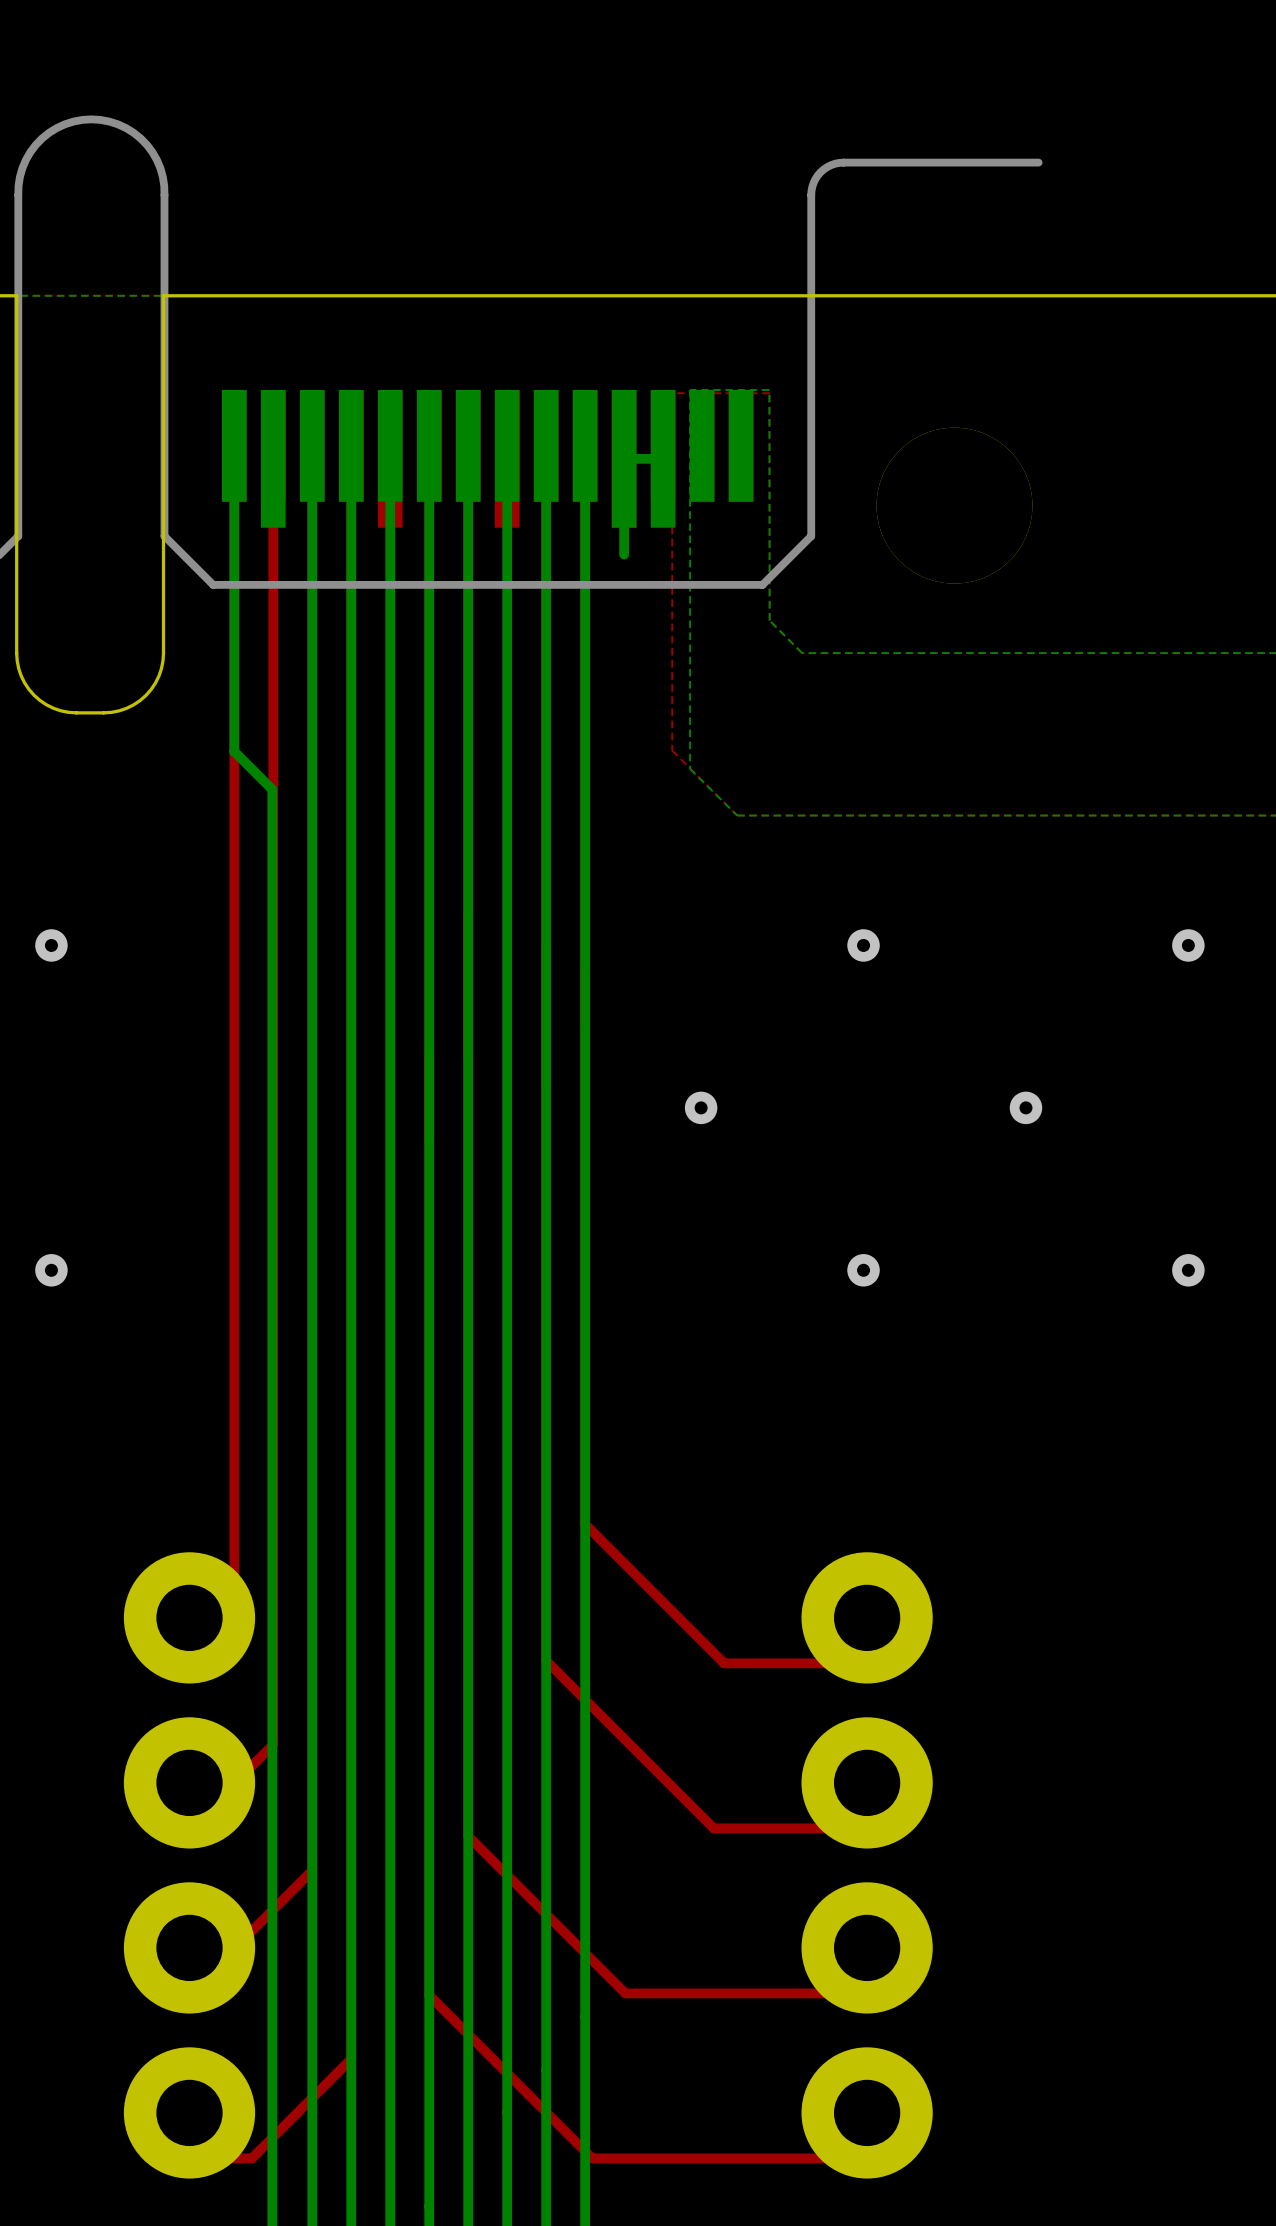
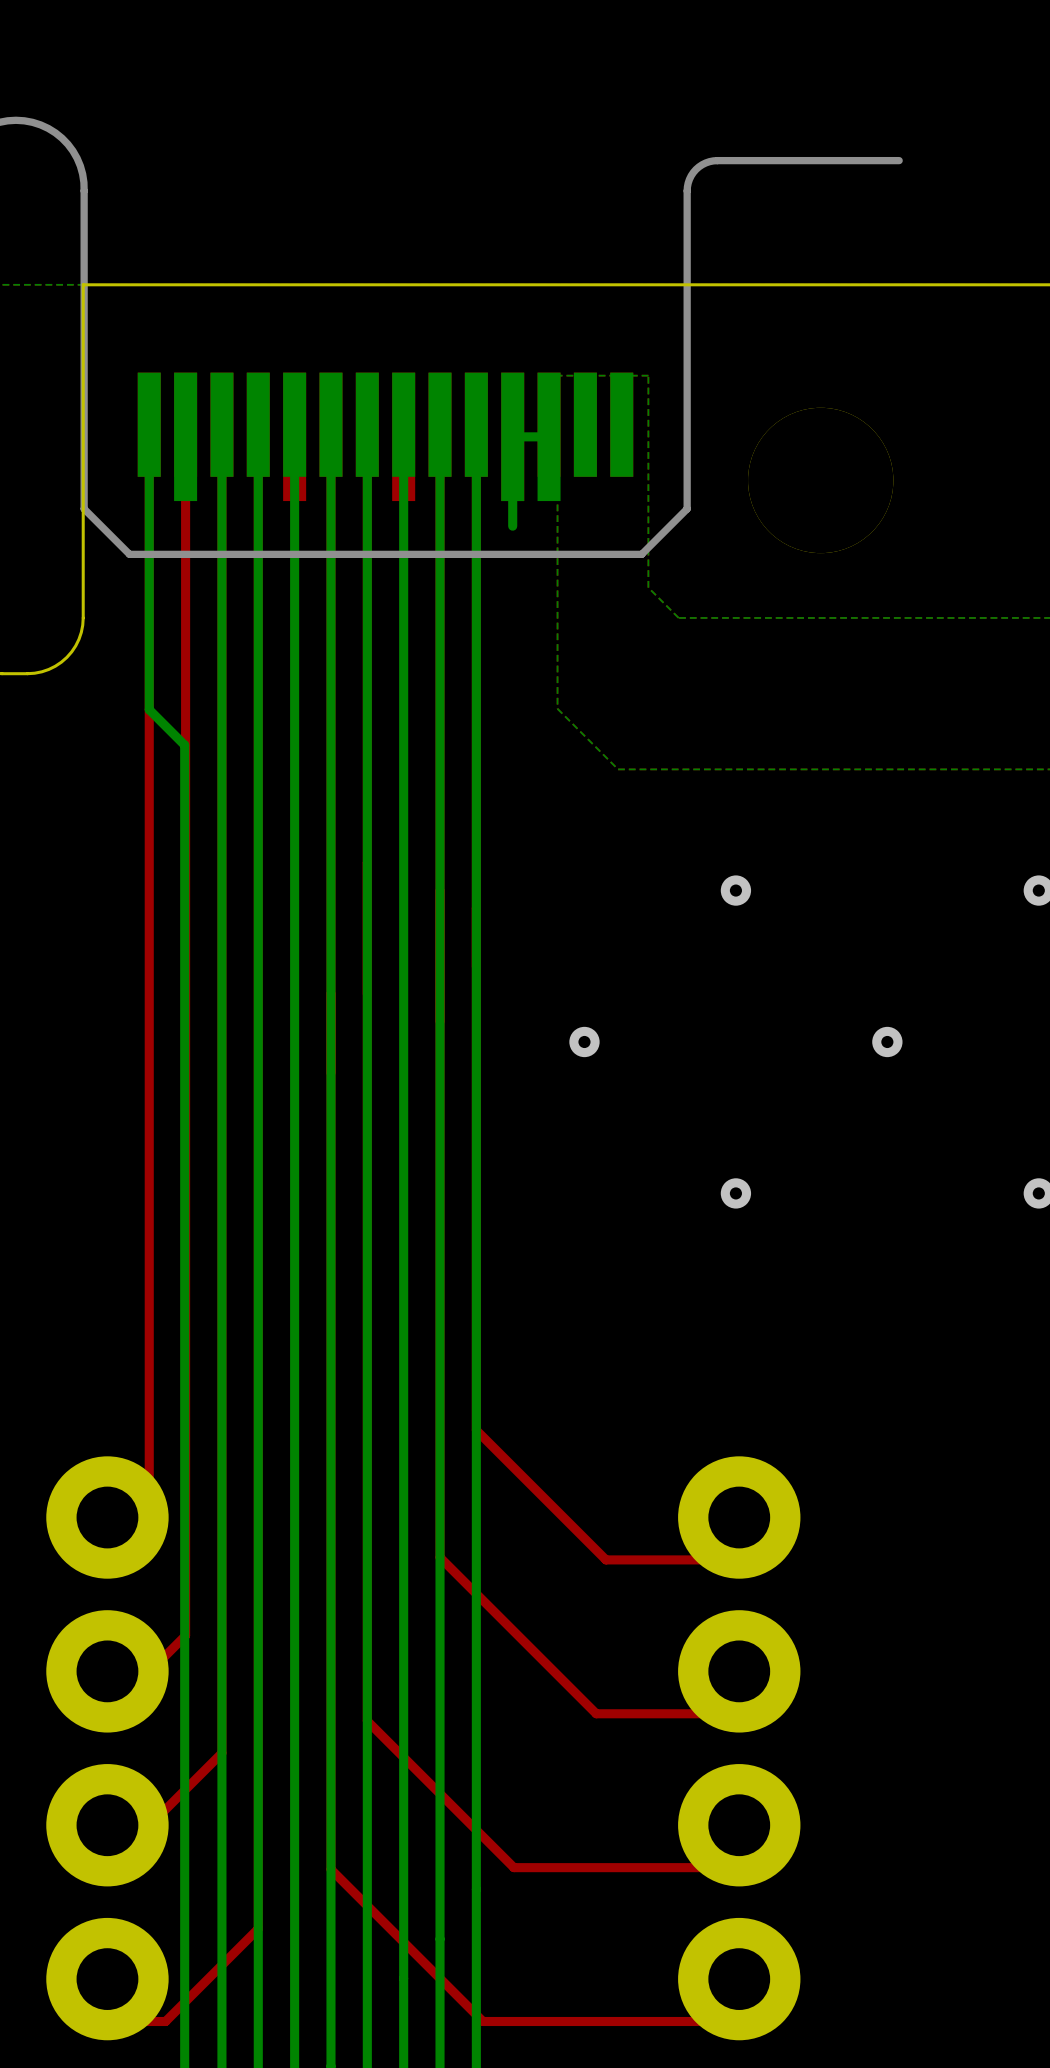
bottom zone outline: (769, 620) (769, 389) (690, 389) (690, 768) (737, 815) -> (648, 587) (648, 375) (557, 375) (557, 708) (618, 769)

